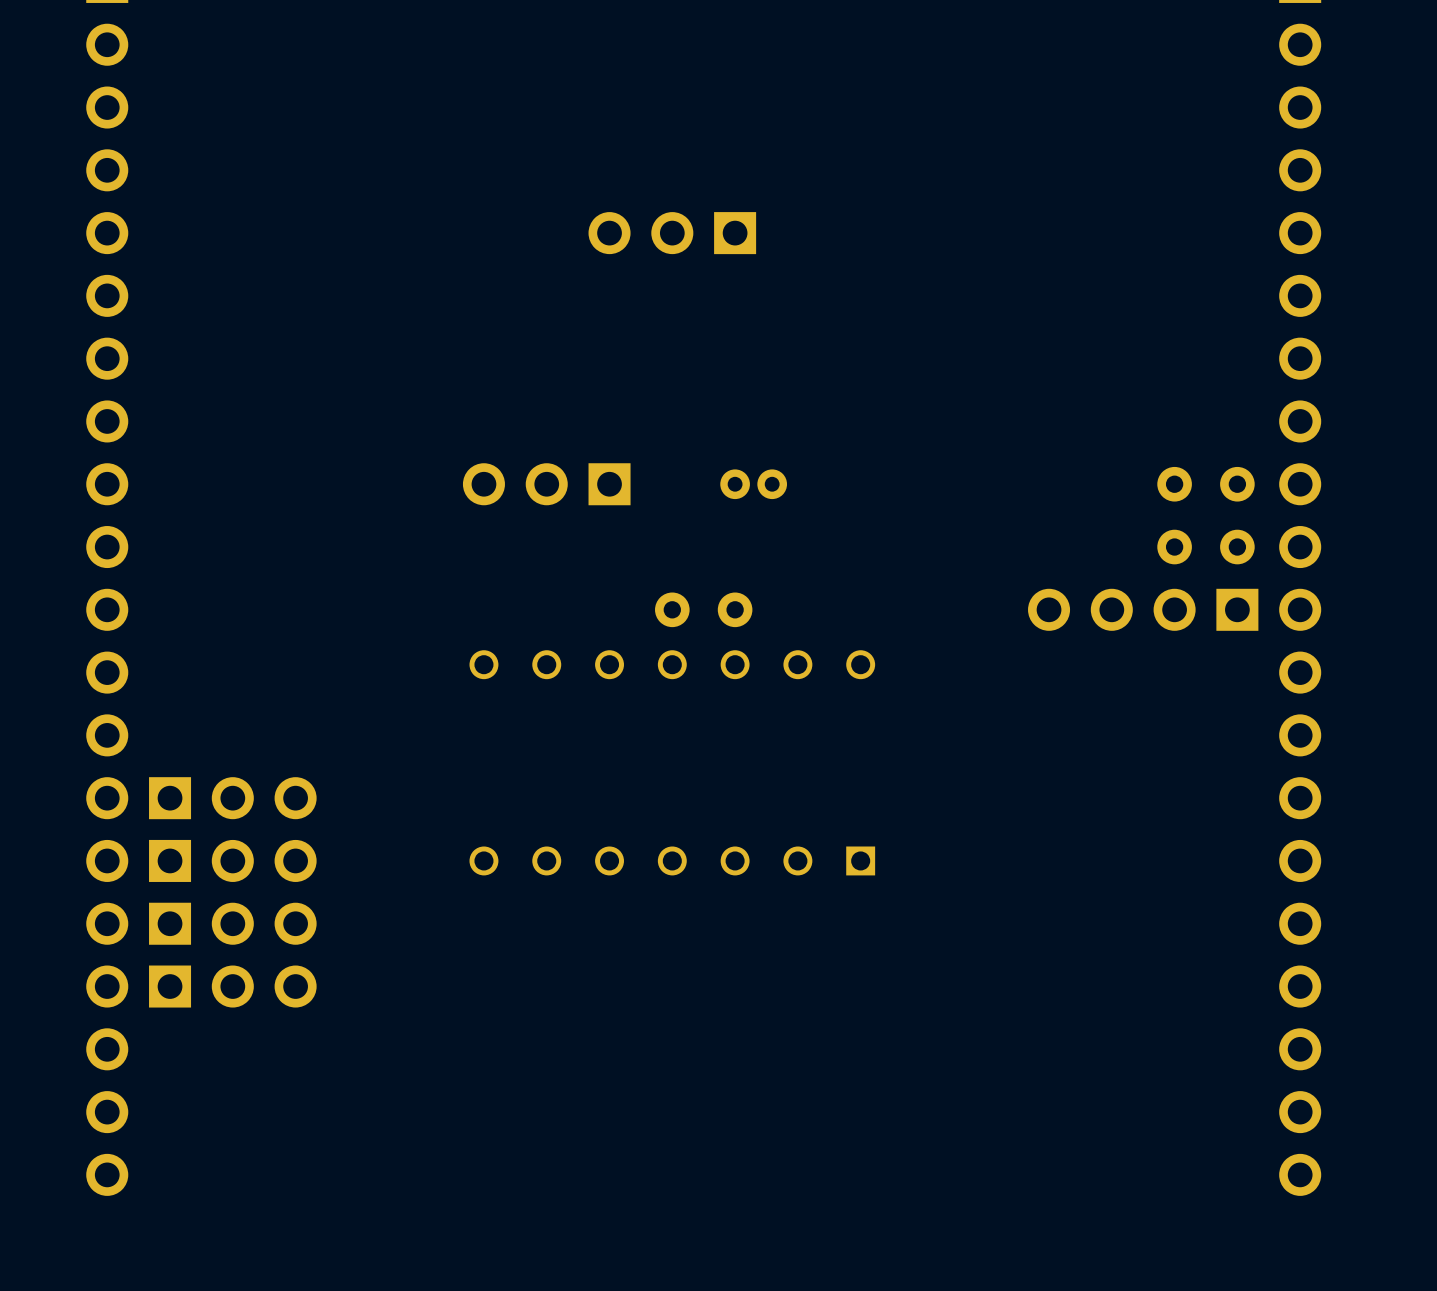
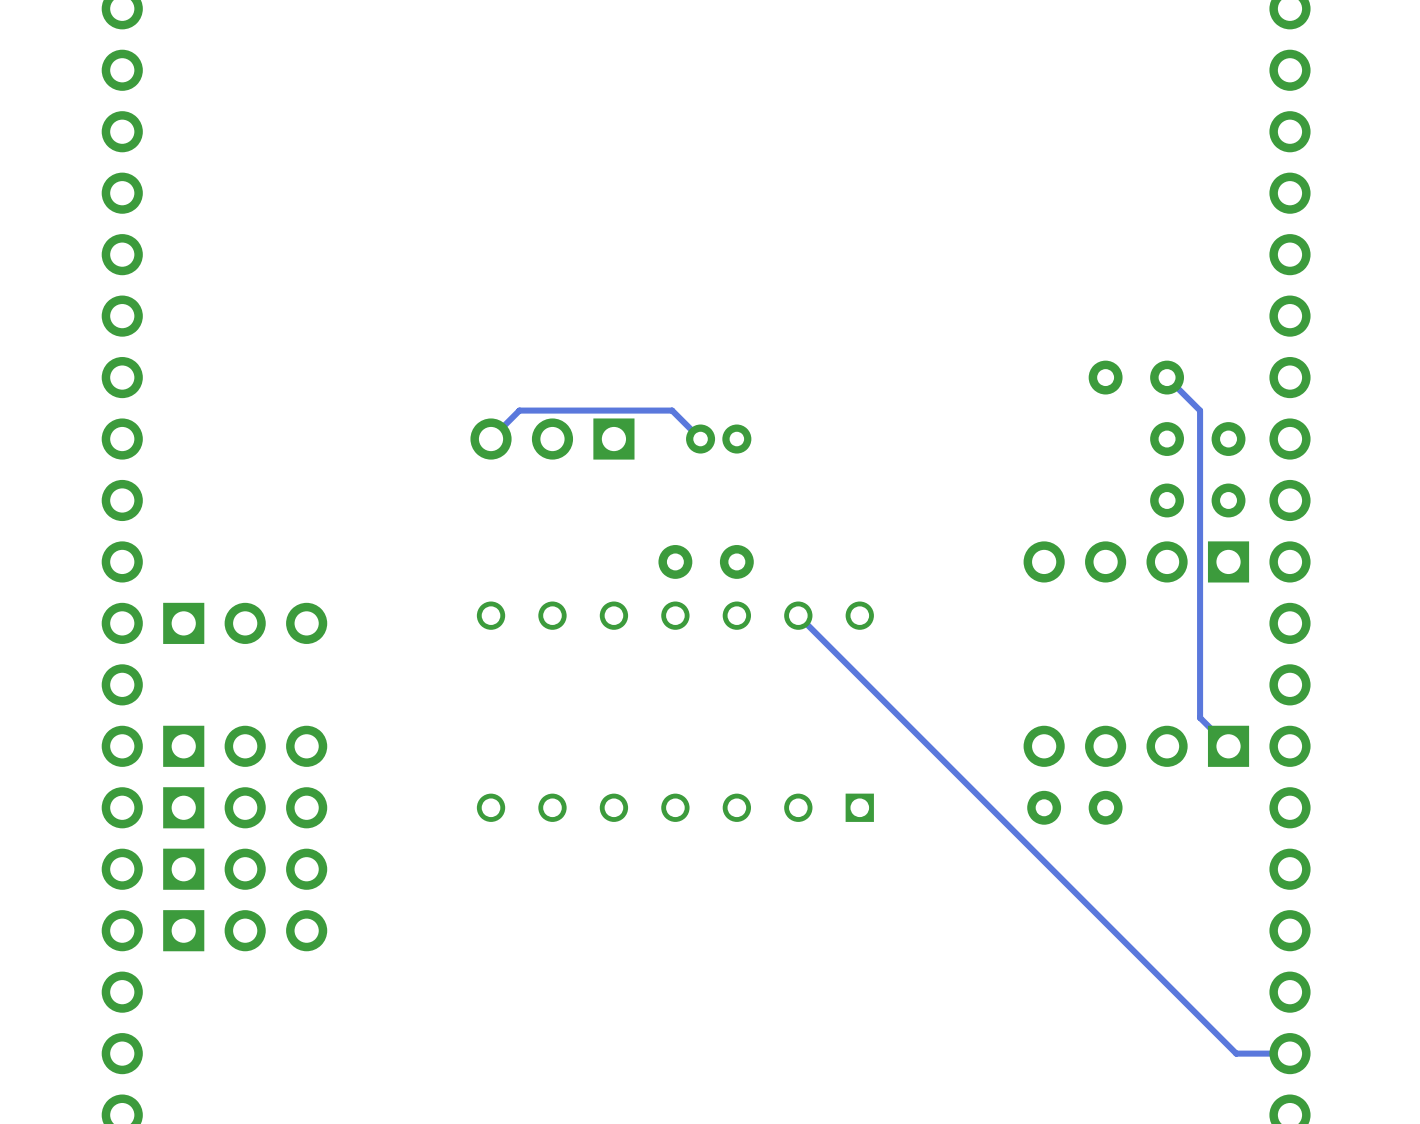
part: (672, 233) -> none
part: none -> (1136, 377)
track: none -> (1167, 377) (1200, 410) (1200, 717) (1228, 746)
track: none -> (700, 439) (672, 410) (519, 410) (491, 439)
part position: (753, 484) -> (718, 439)
track: none -> (798, 615) (1236, 1053) (1289, 1053)
part: none -> (245, 623)
part: none -> (1136, 746)
part: none -> (1074, 807)

